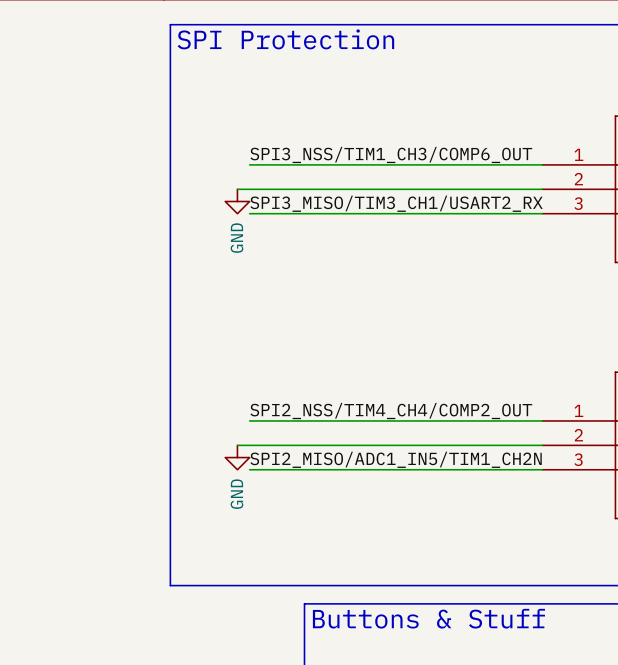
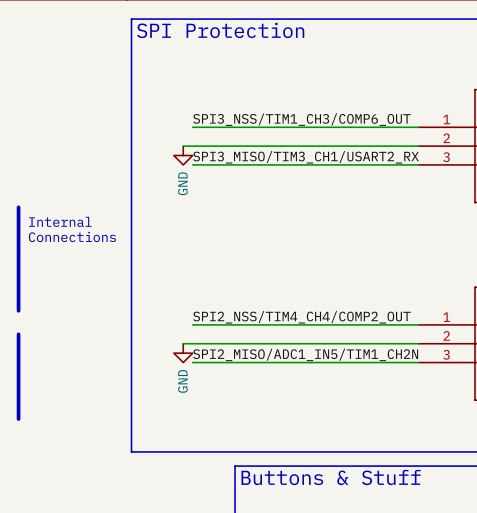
line: none -> (18, 207) (18, 310)
text: none -> Internal (60, 221)
text: none -> Connections (72, 236)
line: none -> (18, 334) (18, 419)

